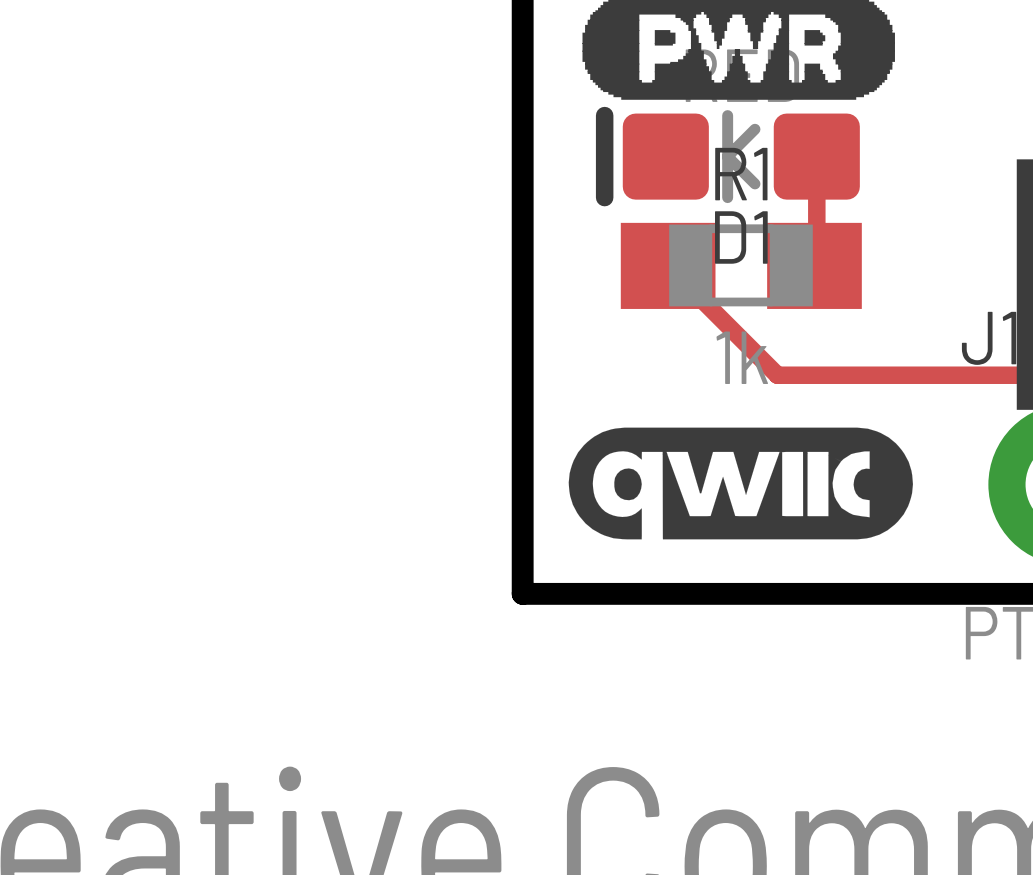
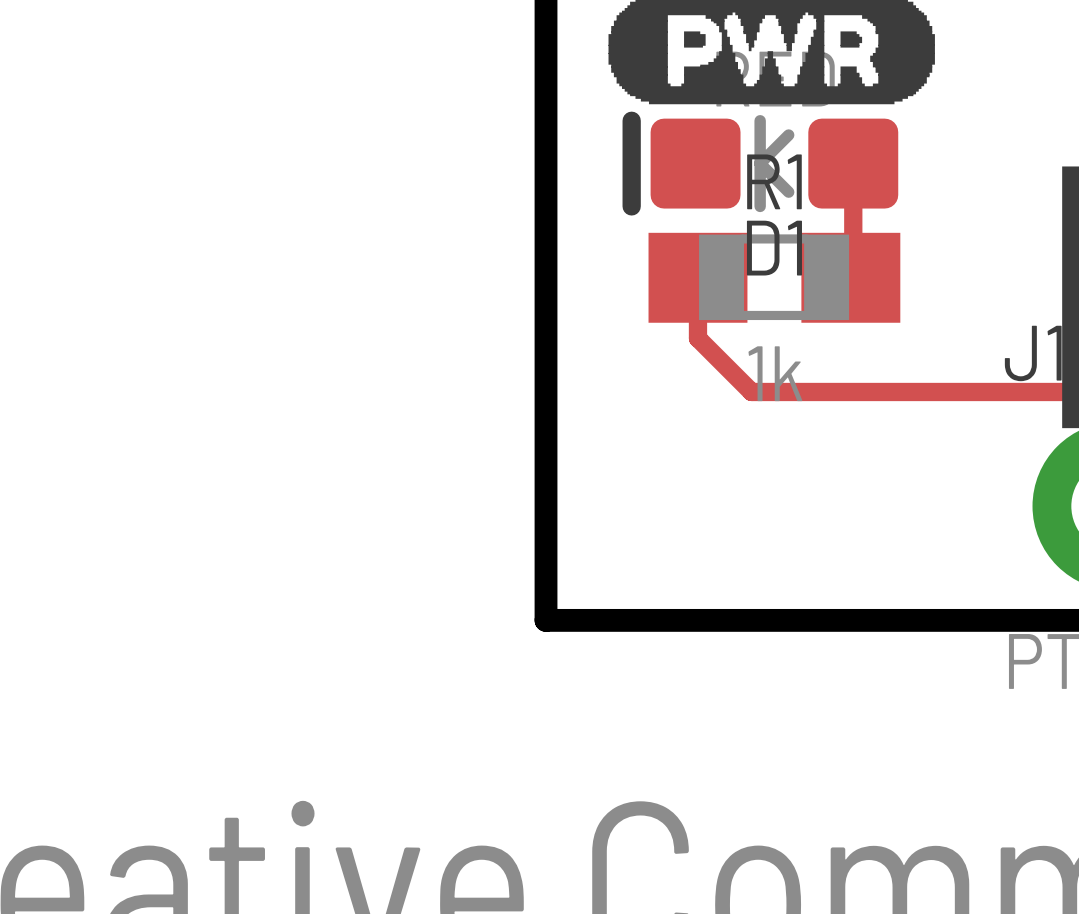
track: (668, 265) (777, 375) -> (697, 277) (697, 338) (751, 391) (812, 391)
drawing: [568, 427, 913, 540] -> none

